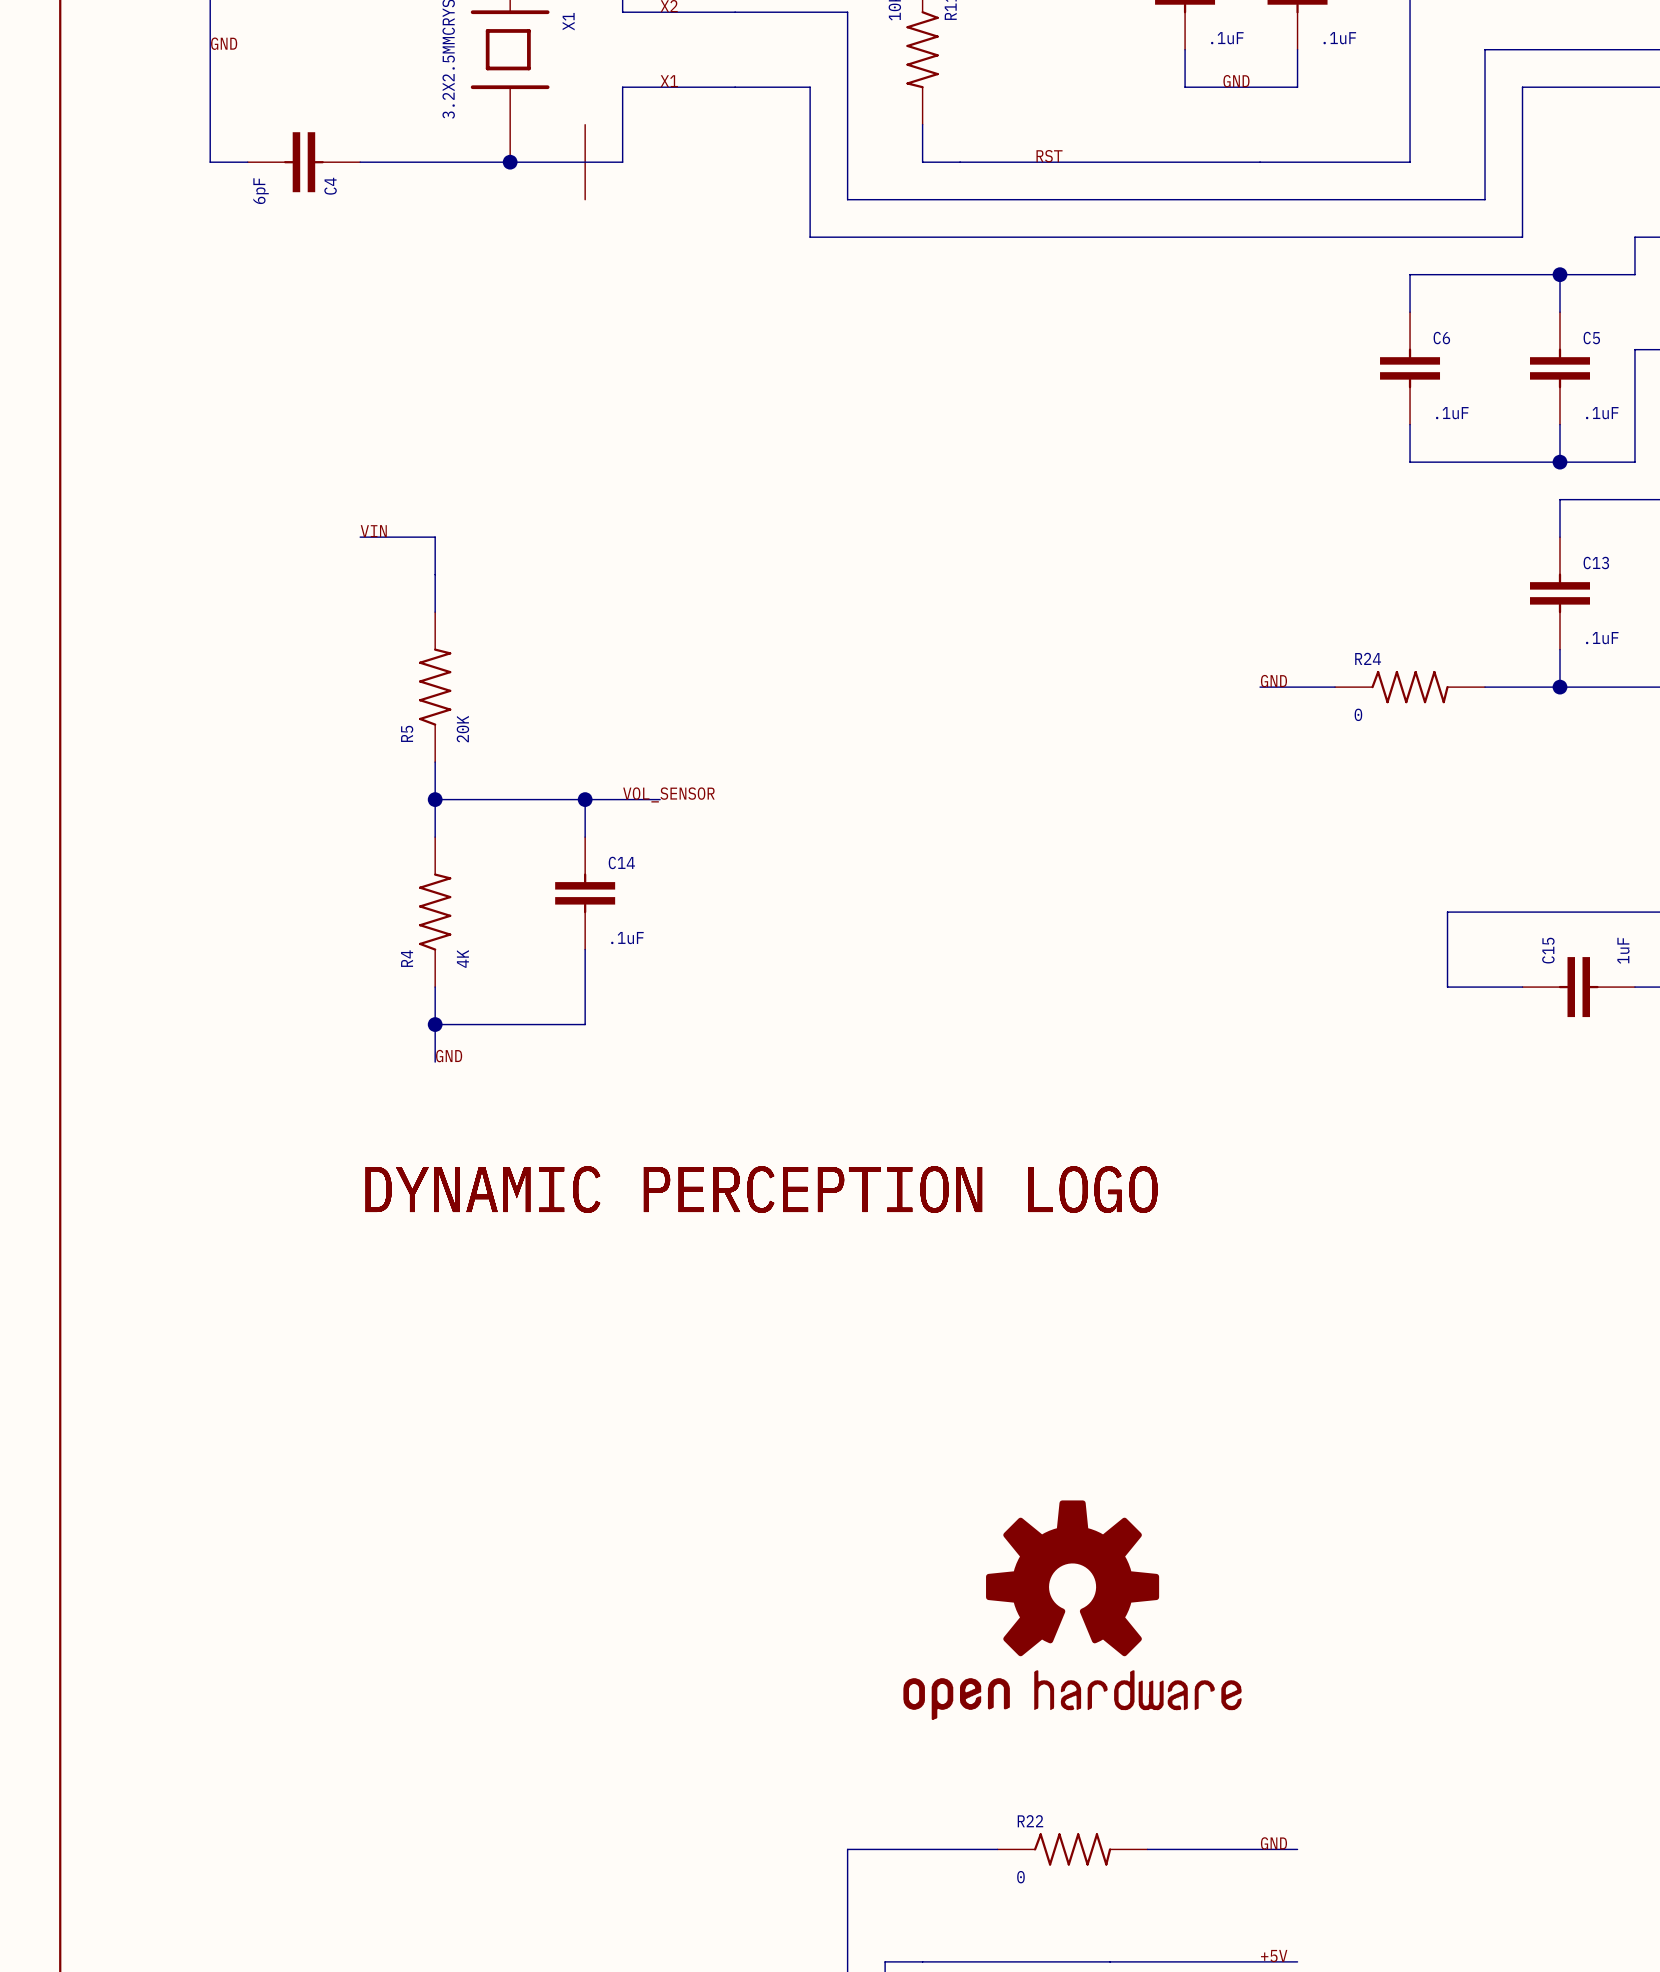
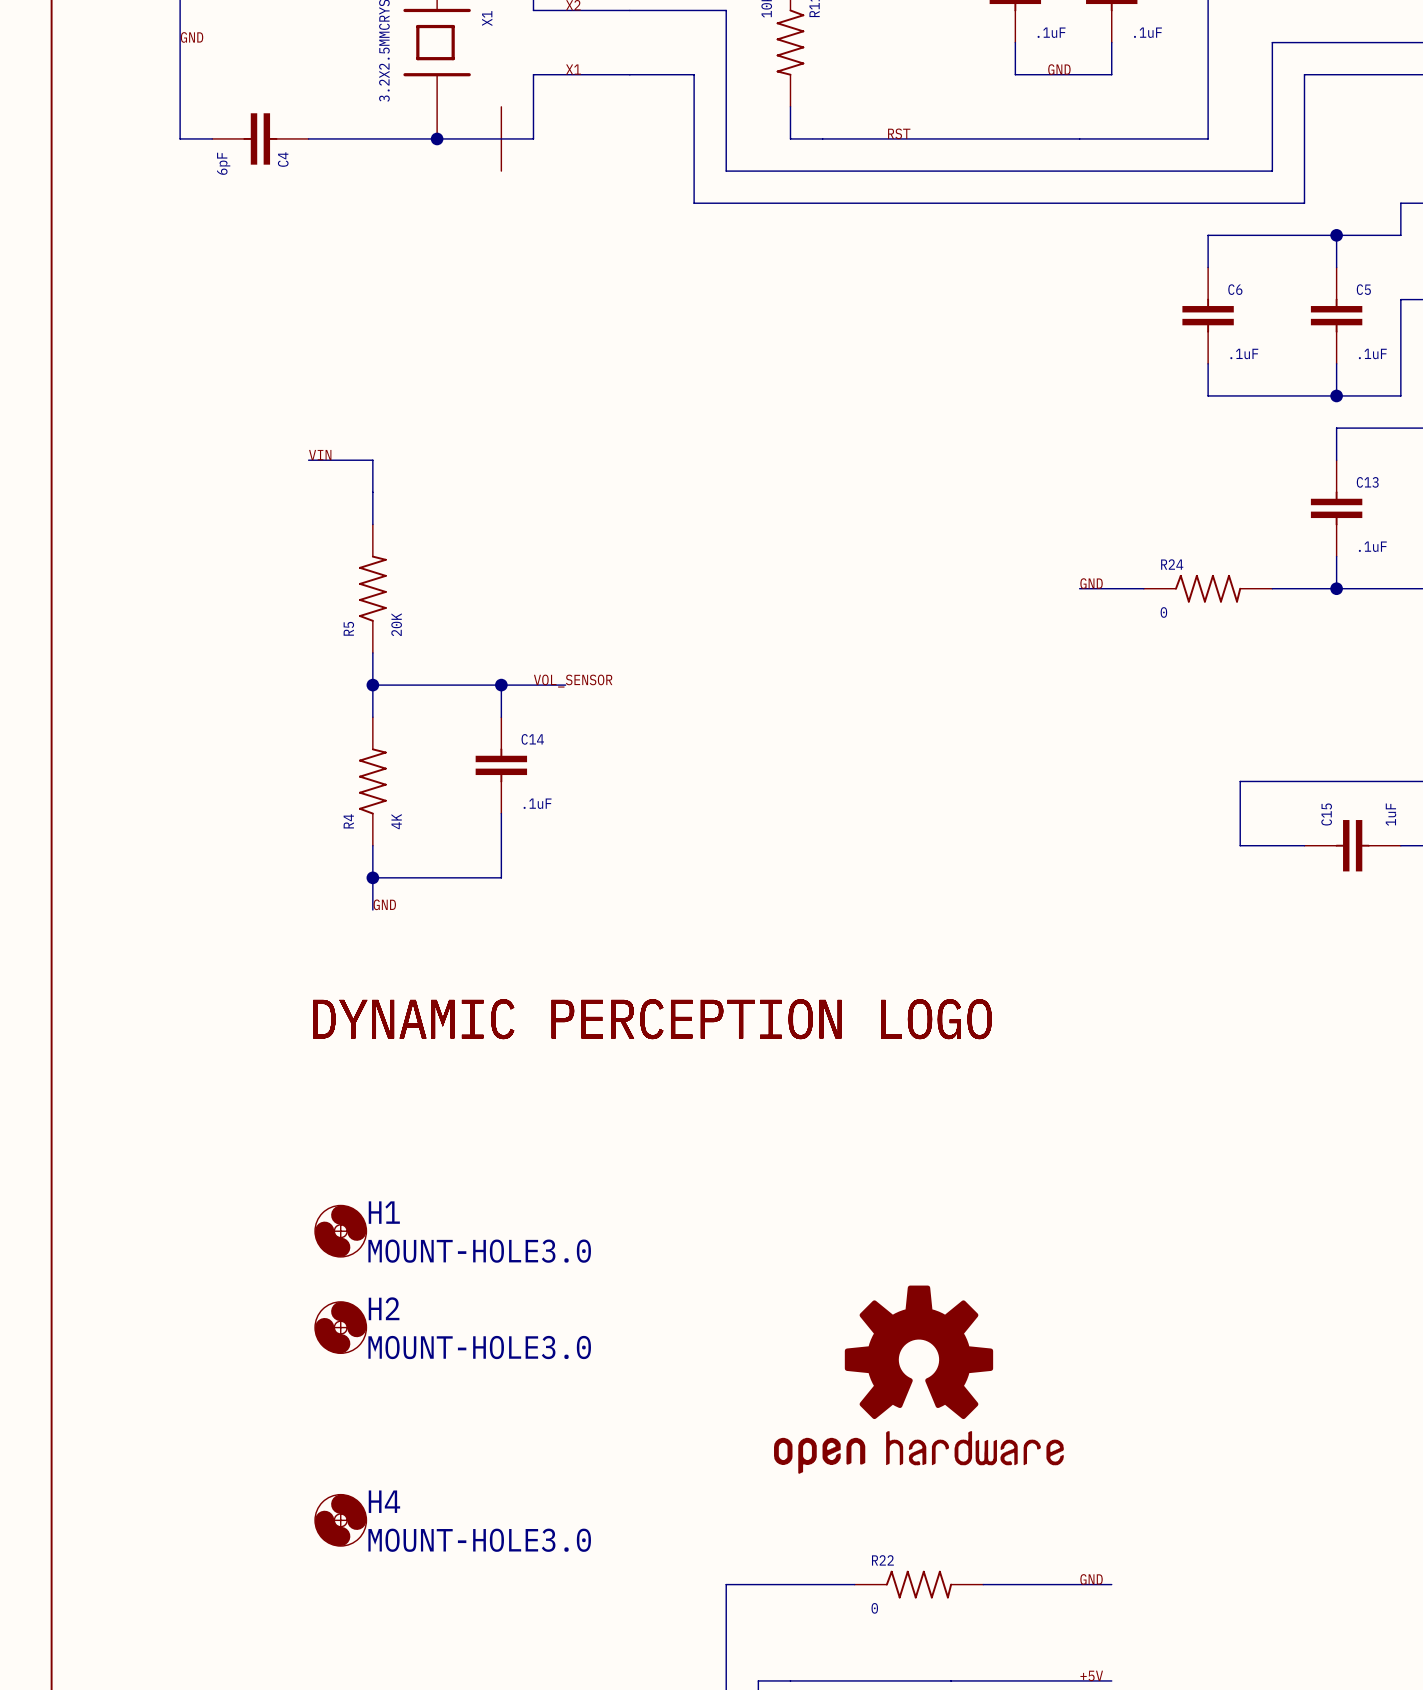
H1: none -> MOUNT-HOLE3.0 (340, 1231)
H2: none -> MOUNT-HOLE3.0 (340, 1327)
H4: none -> MOUNT-HOLE3.0 (340, 1520)

